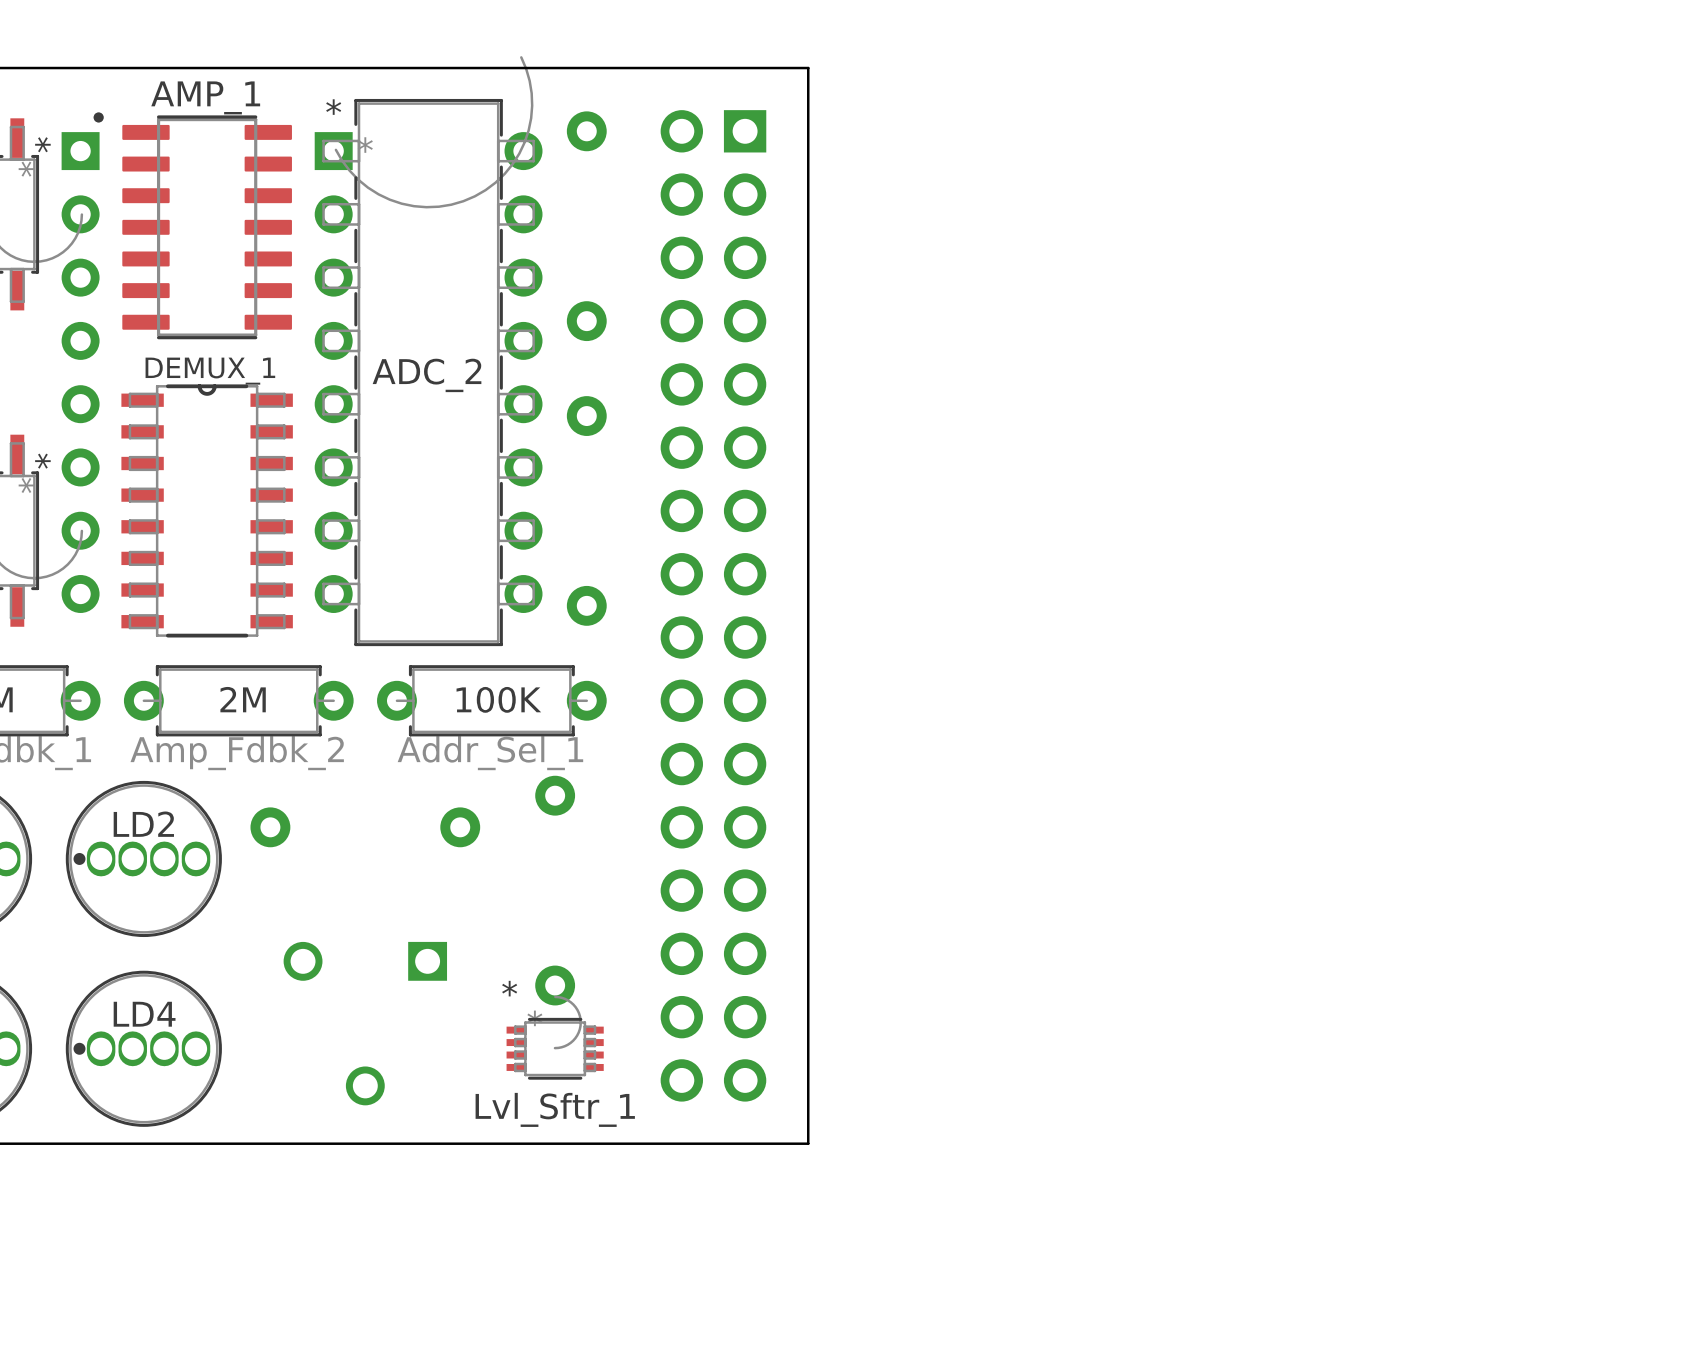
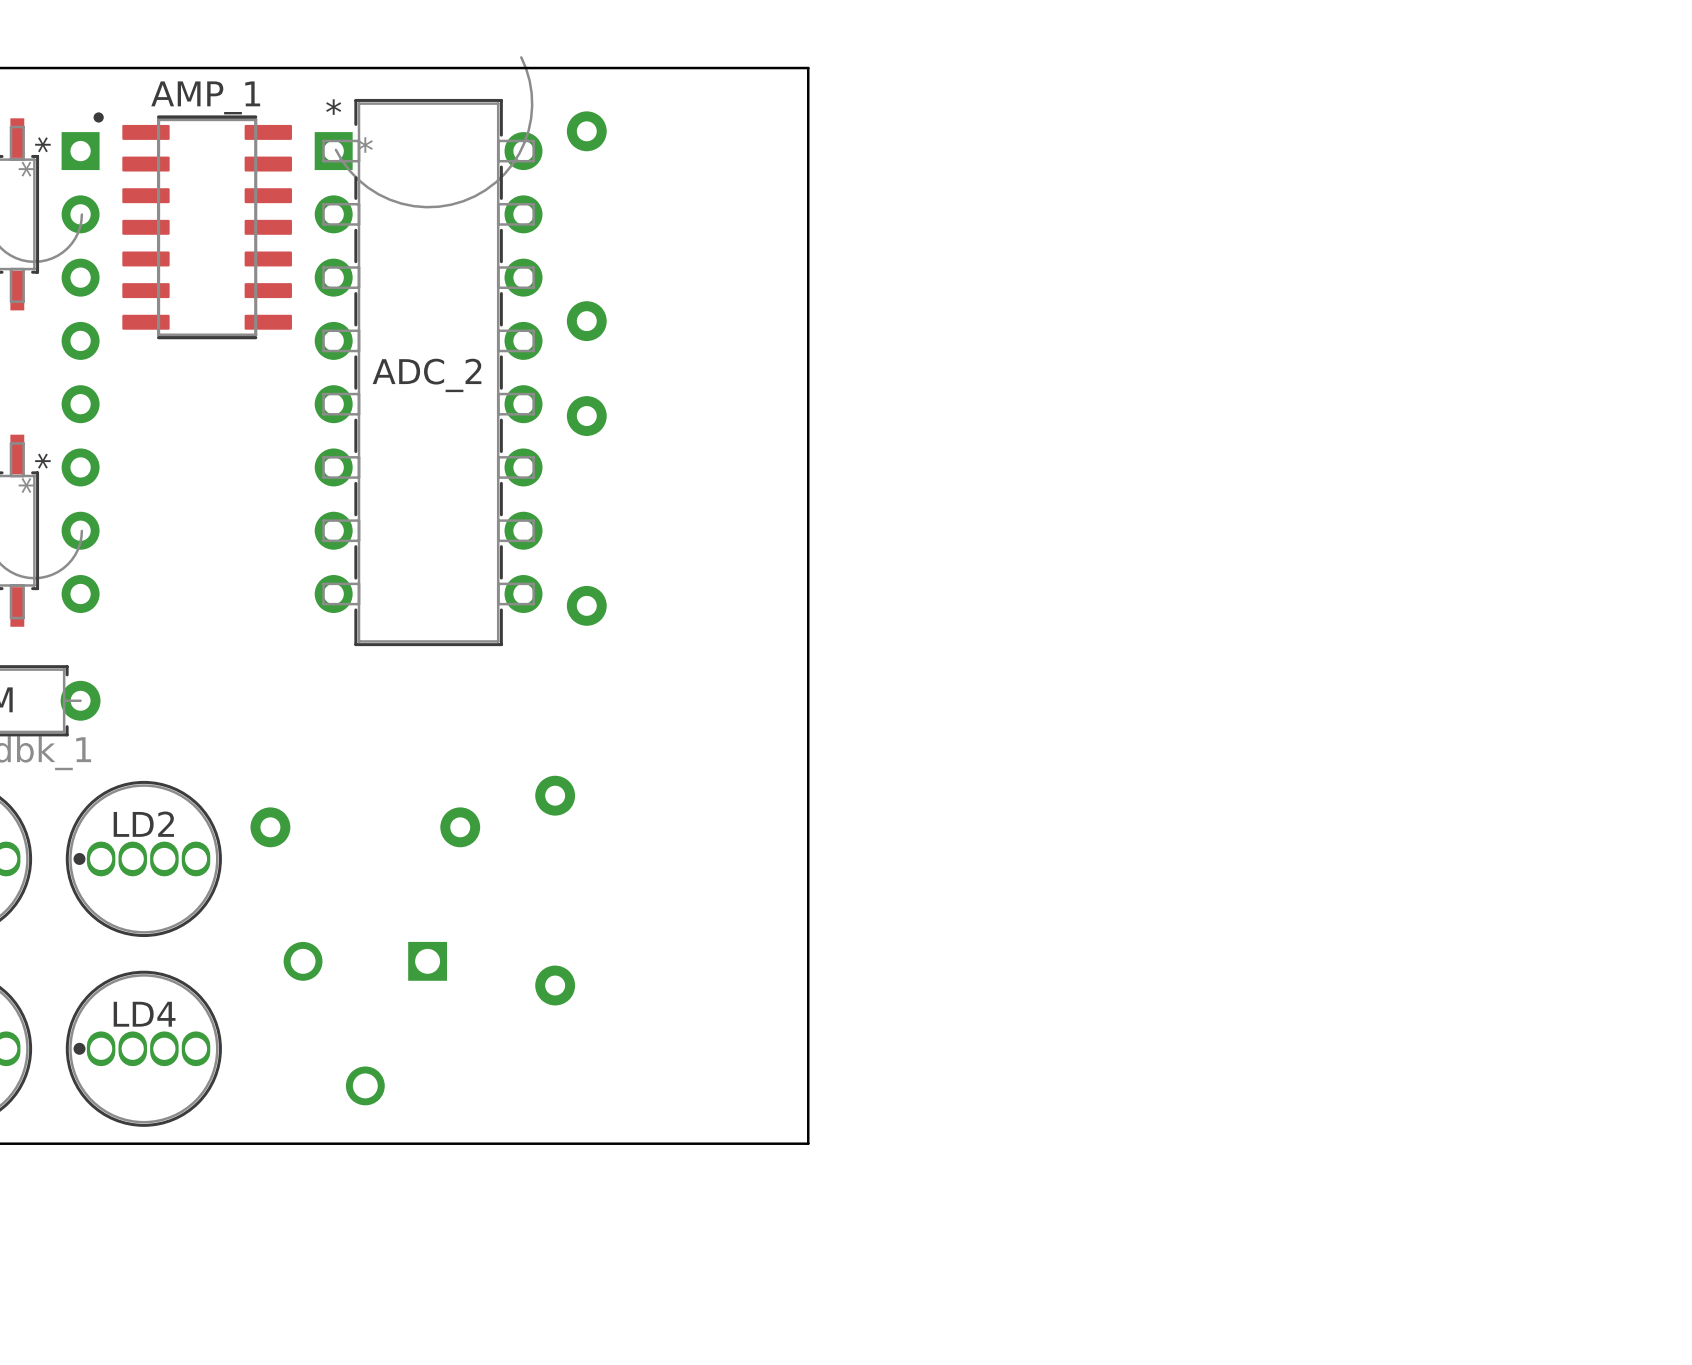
DEMUX_1: (207, 510) -> none
part: (713, 605) -> none
Amp_Fdbk_2: 2M (238, 700) -> none
Addr_Sel_1: 100K (491, 700) -> none
Lvl_Sftr_1: (555, 1037) -> none

